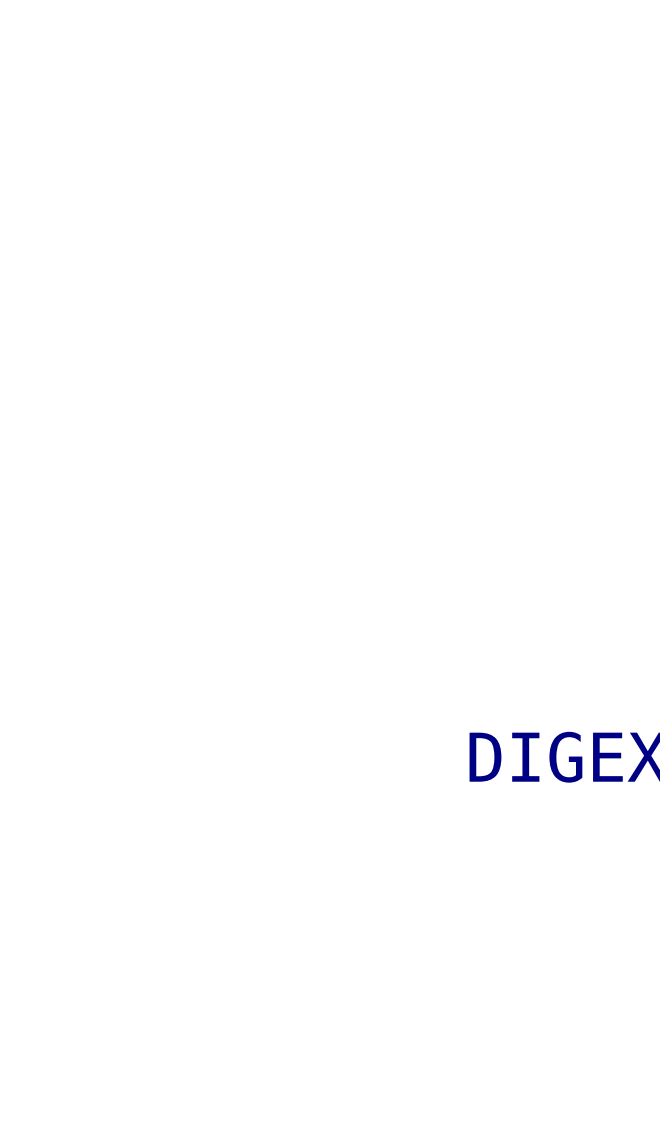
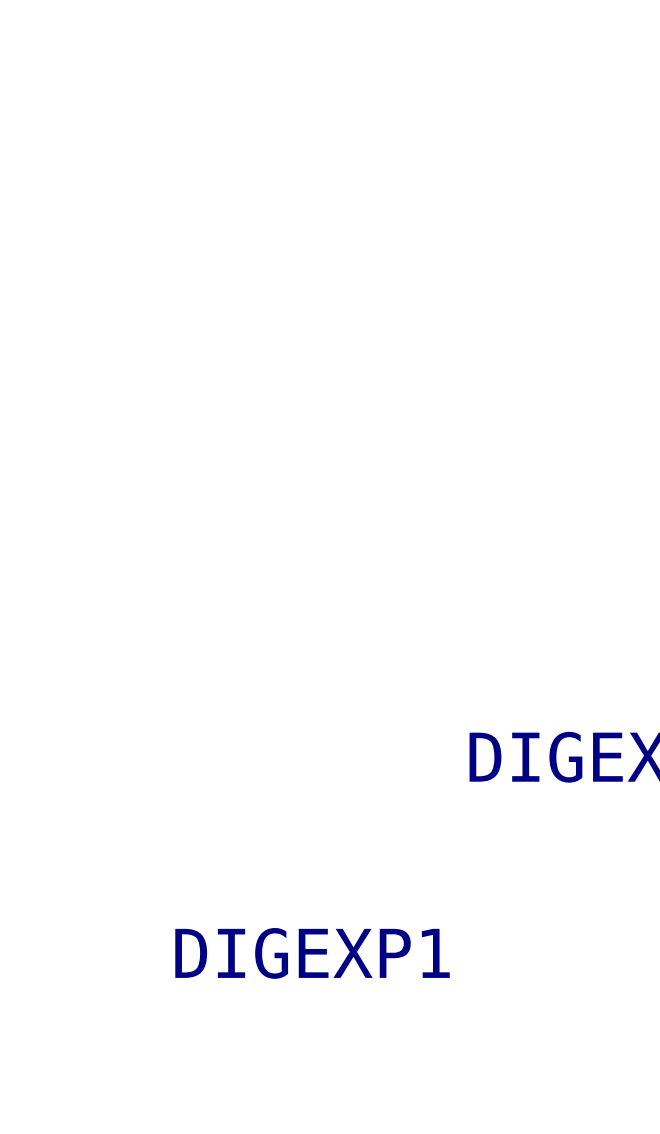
text: none -> DIGEXP1 (312, 953)

